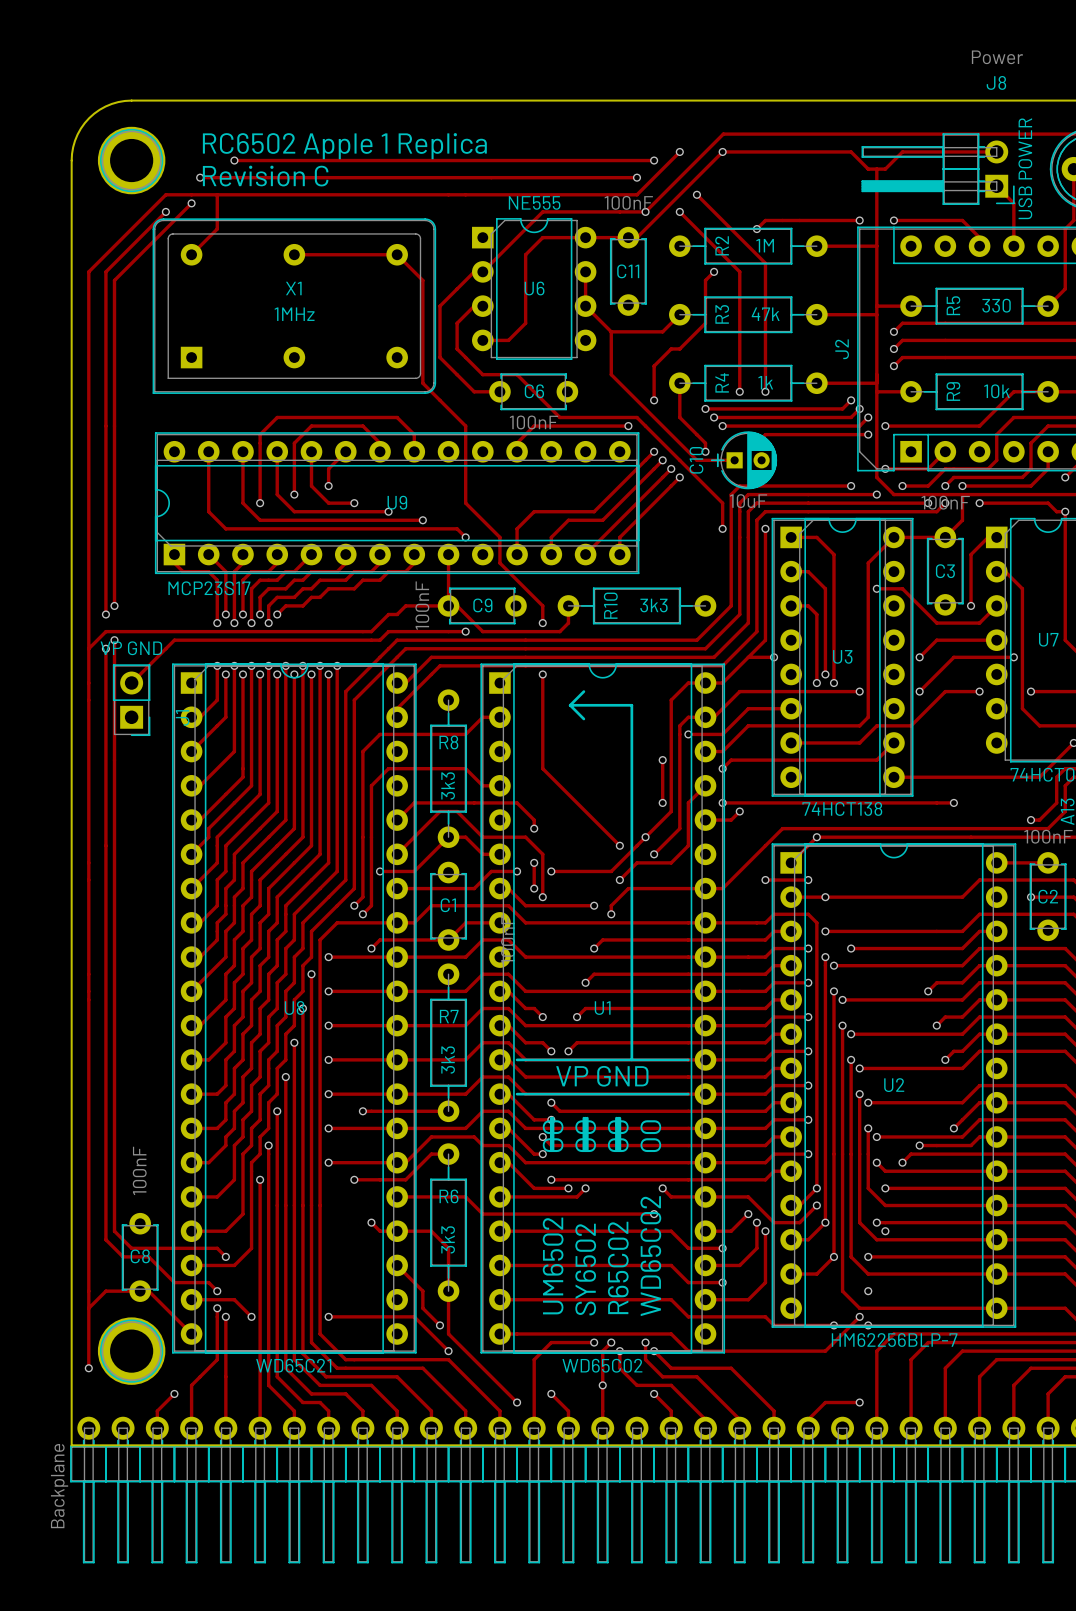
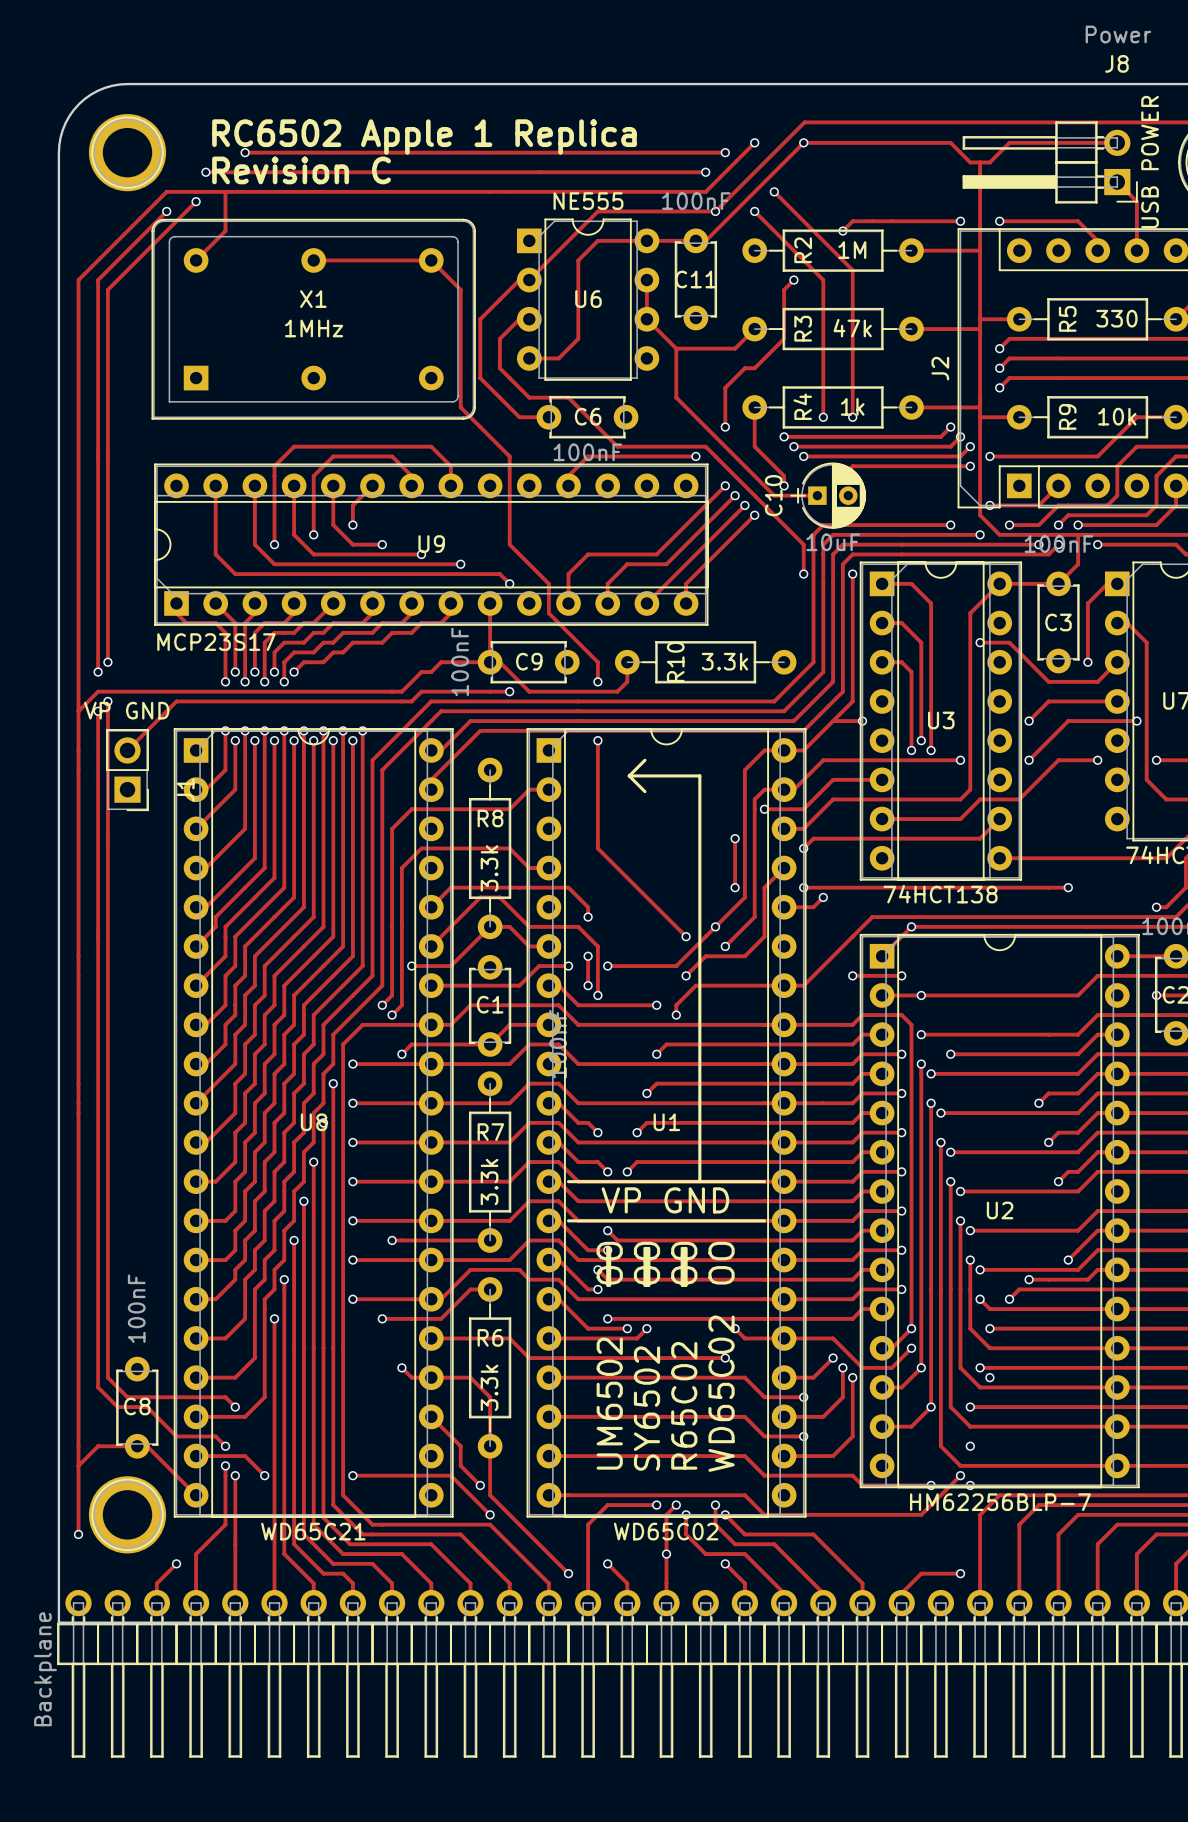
R10 value: 3k3 (653, 605) -> 3.3k (724, 661)
R8 value: 3k3 (448, 785) -> 3.3k (489, 868)
R7 value: 3k3 (448, 1060) -> 3.3k (489, 1182)
R6 value: 3k3 (448, 1239) -> 3.3k (489, 1387)

